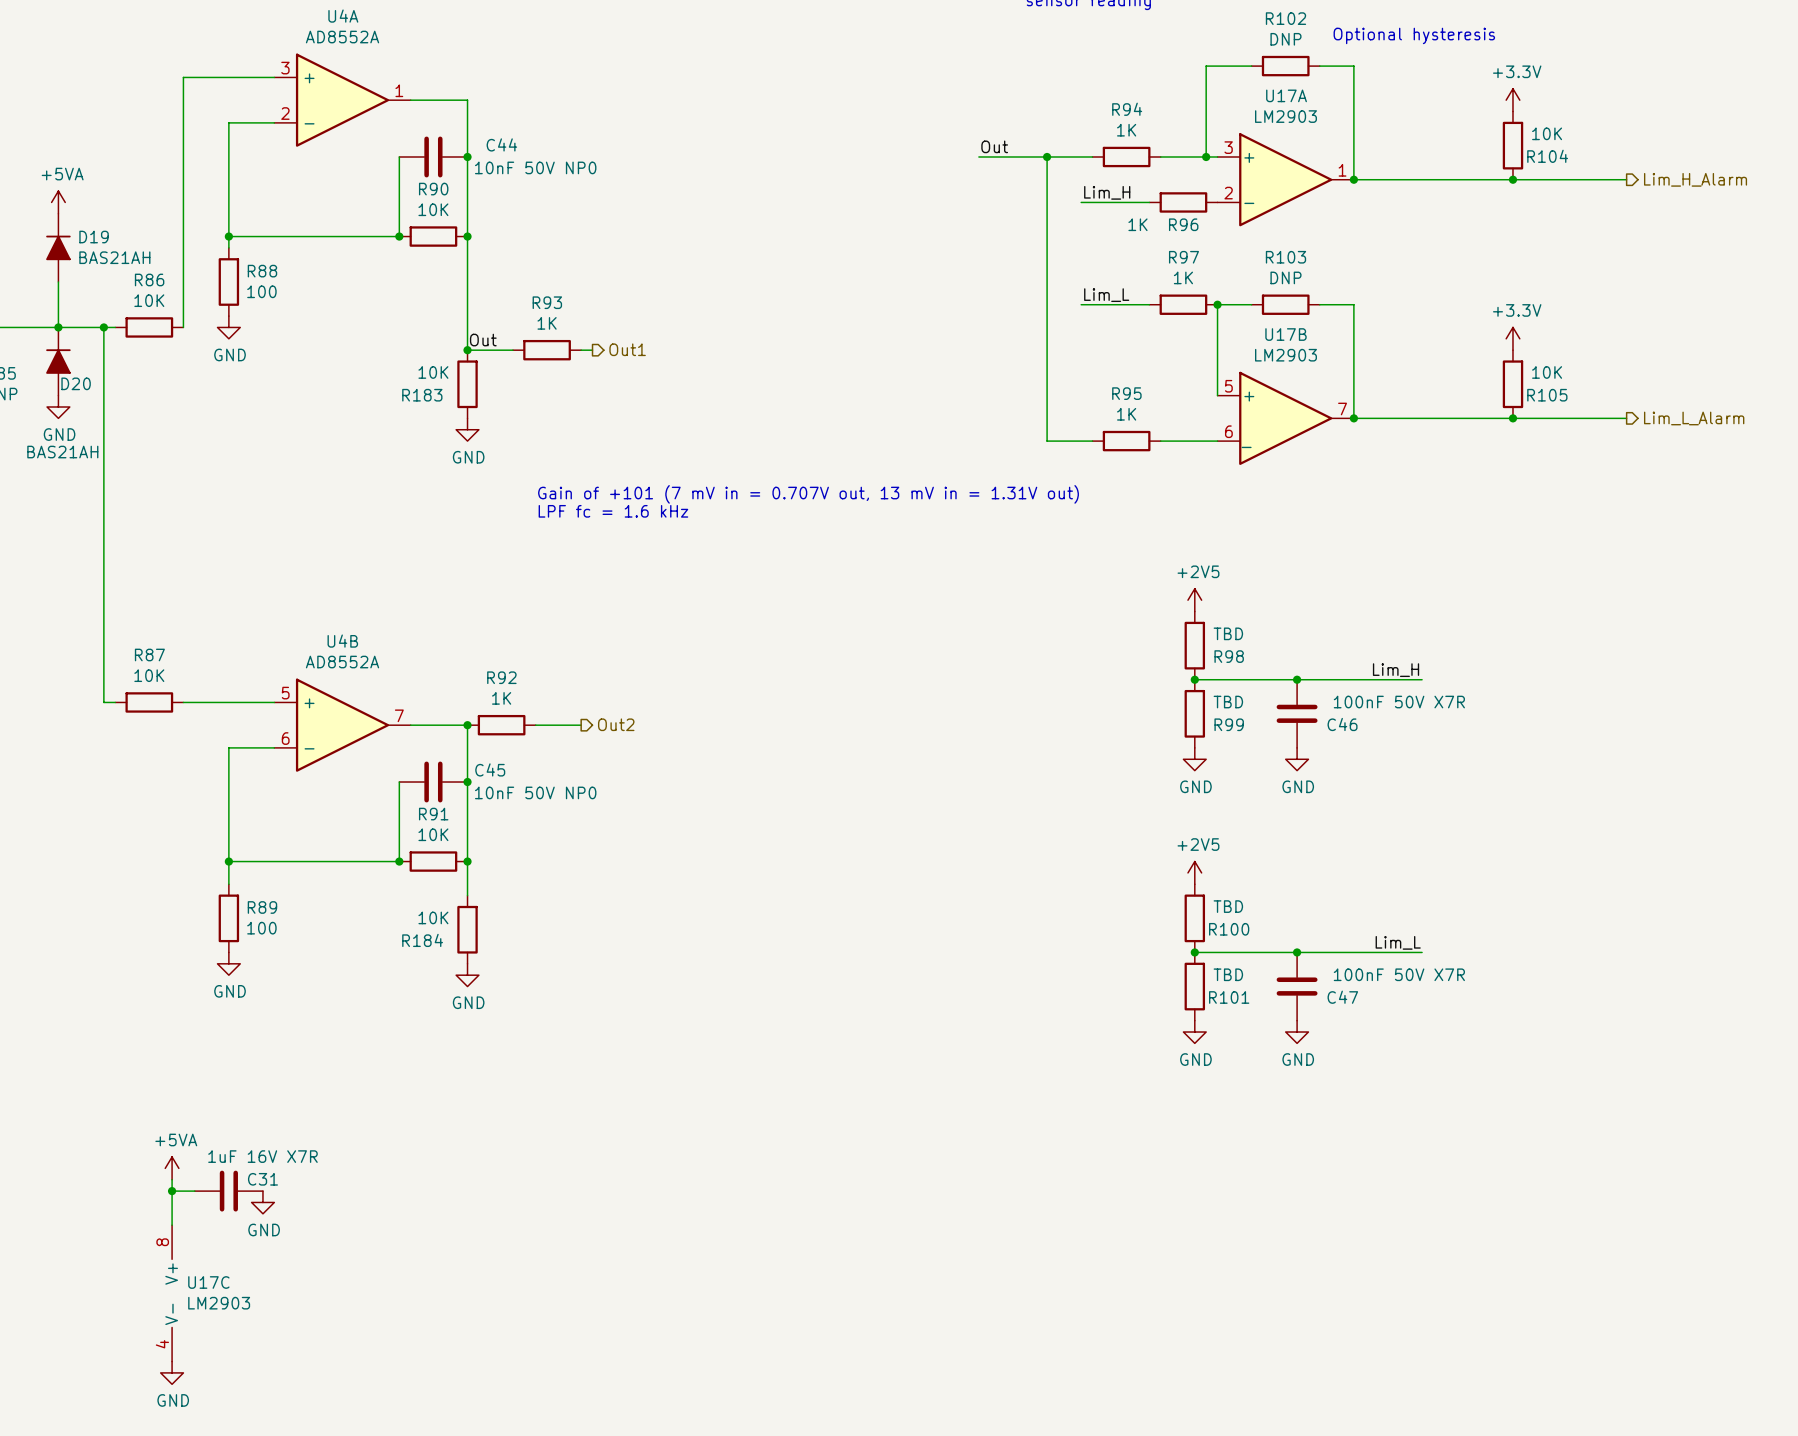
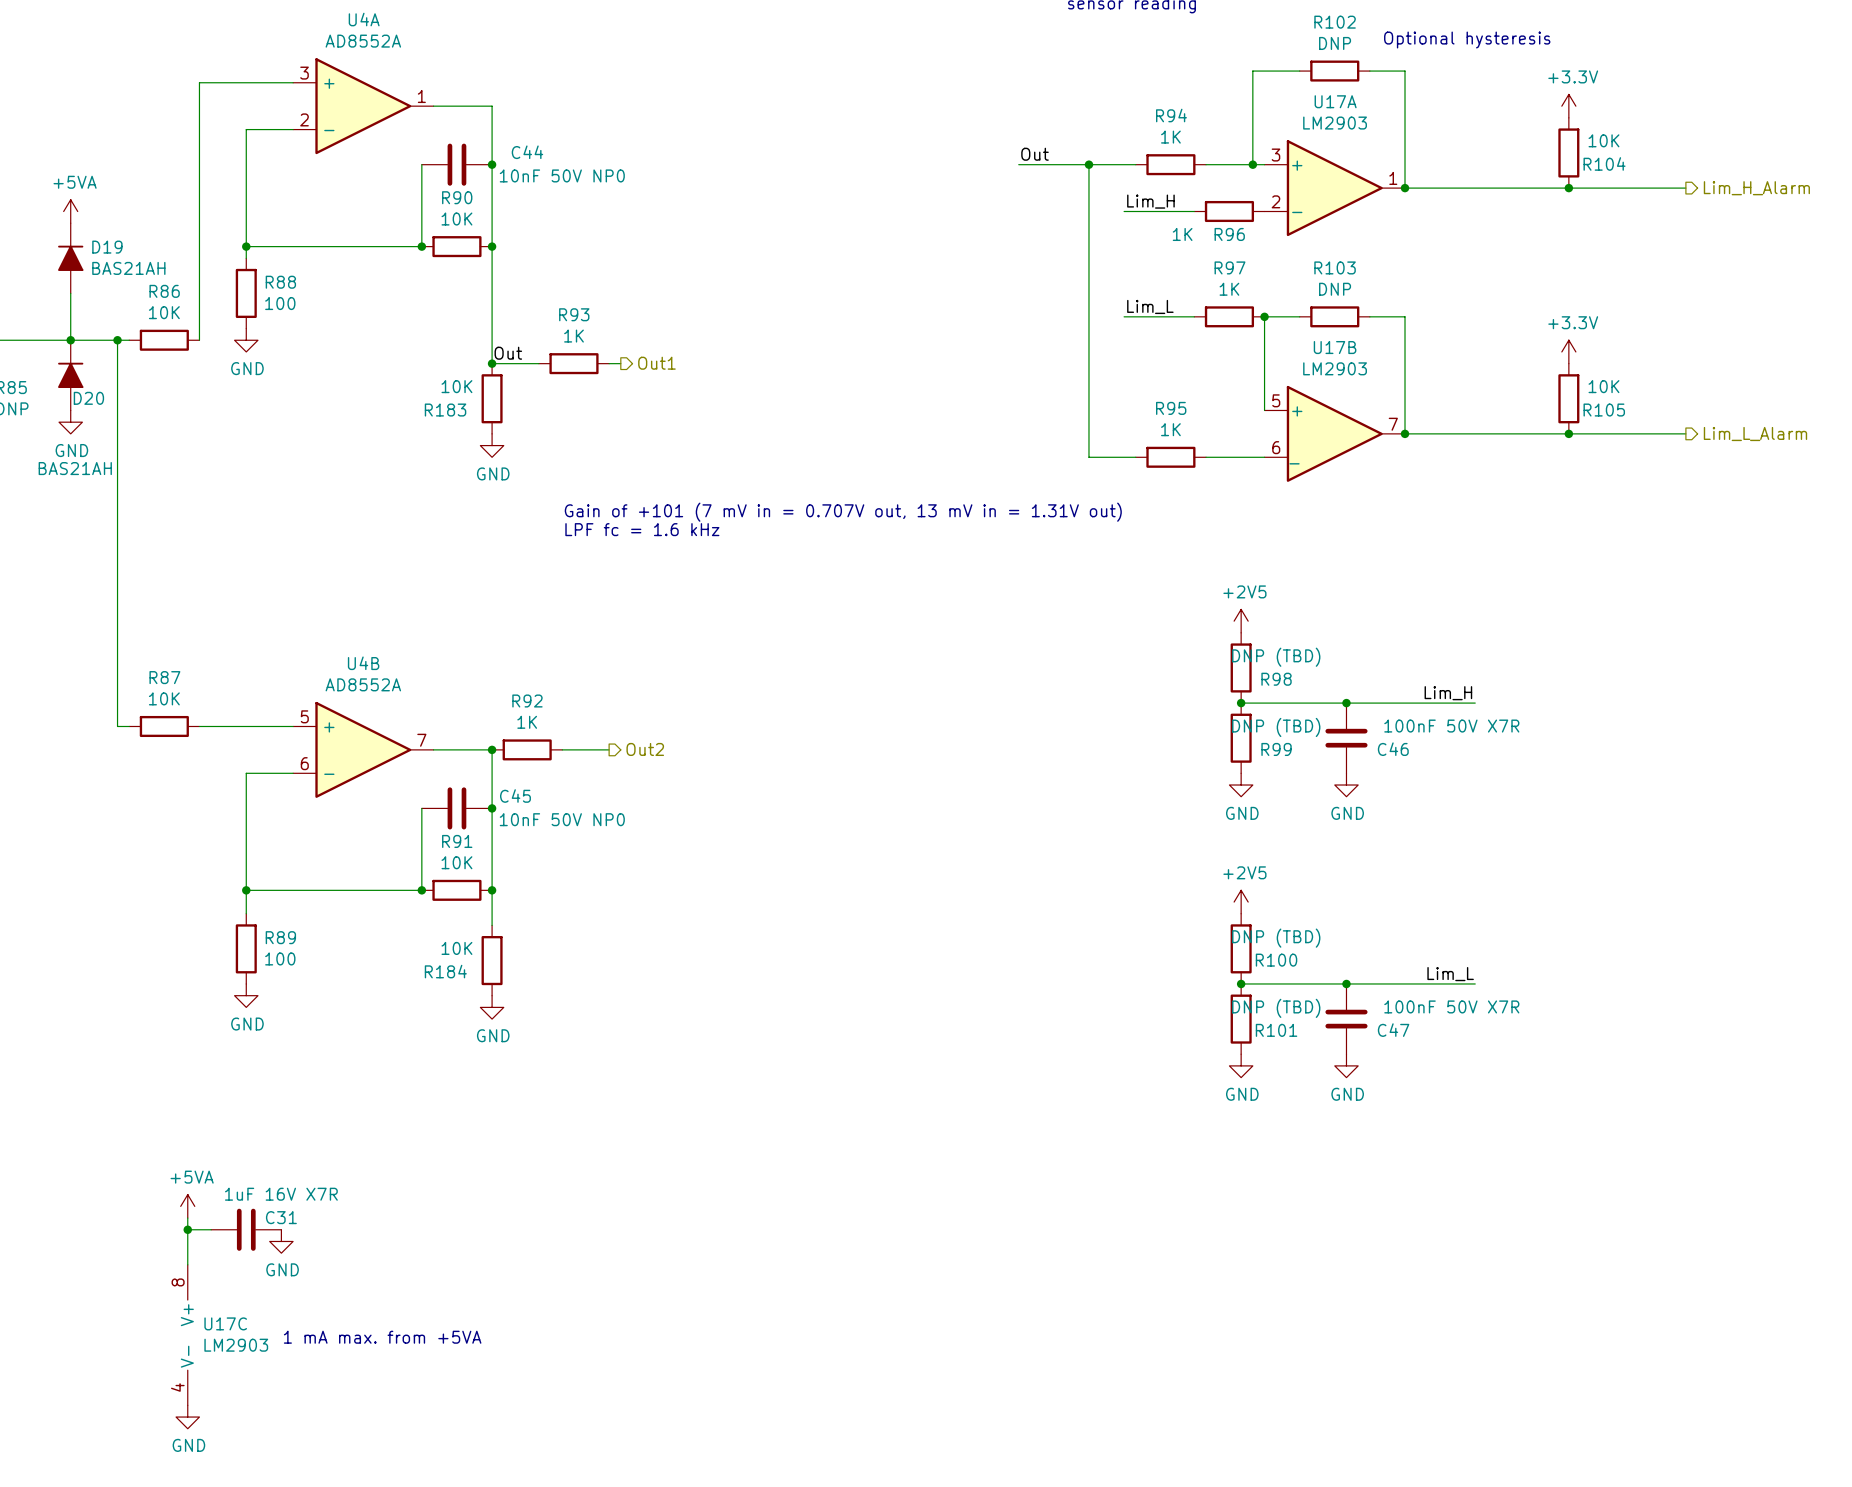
R98 value: TBD (1228, 633) -> DNP (TBD) (1276, 657)
R99 value: TBD (1228, 702) -> DNP (TBD) (1276, 727)
R100 value: TBD (1228, 906) -> DNP (TBD) (1276, 938)
R101 value: TBD (1228, 974) -> DNP (TBD) (1276, 1008)
text: none -> 1 mA max. from +5VA (382, 1337)

